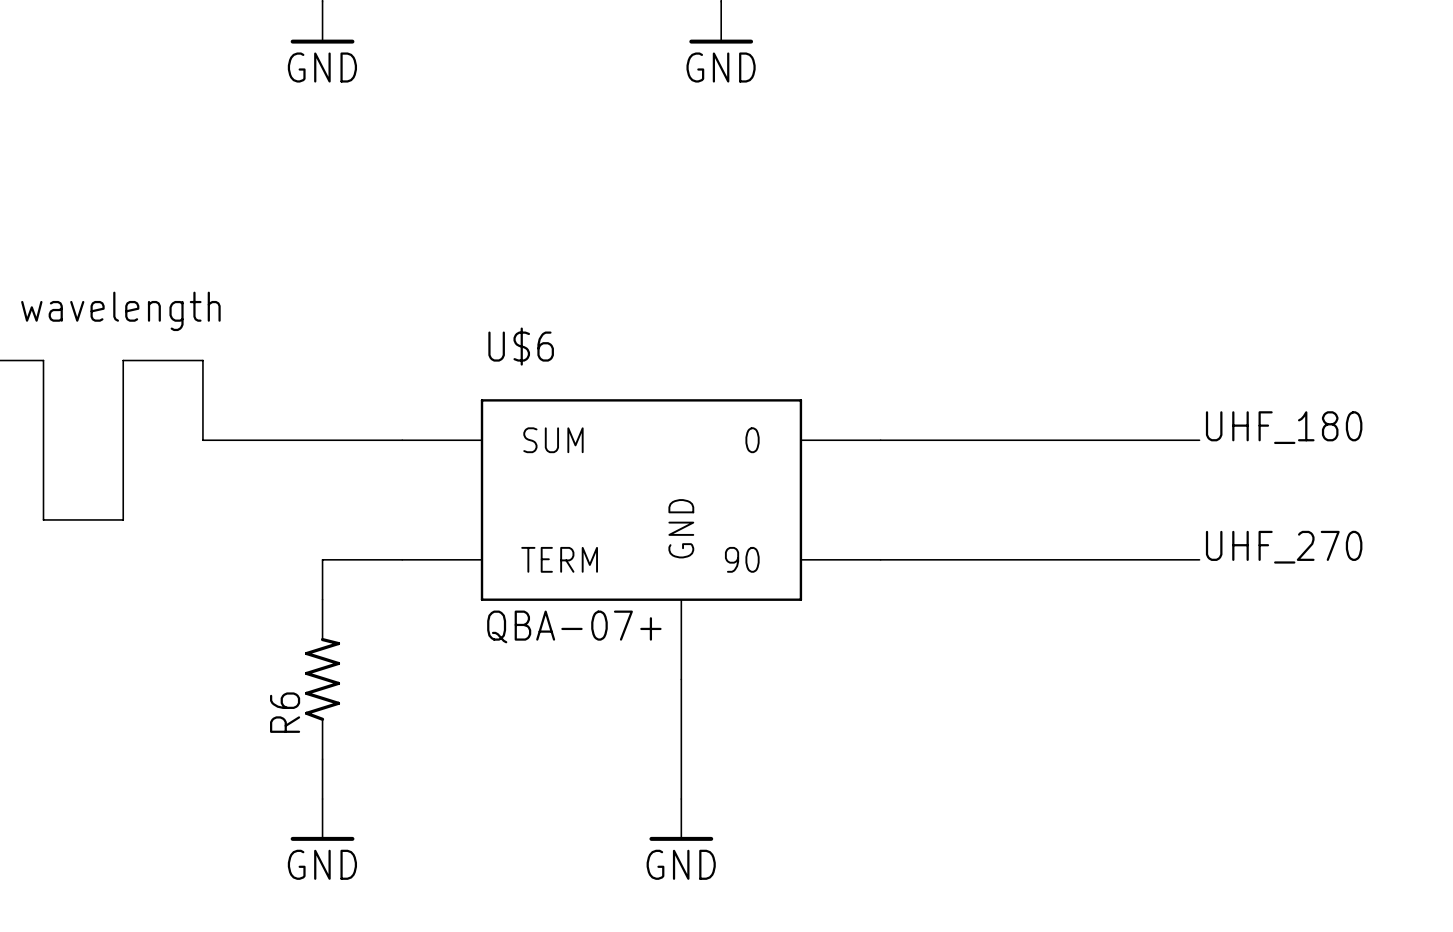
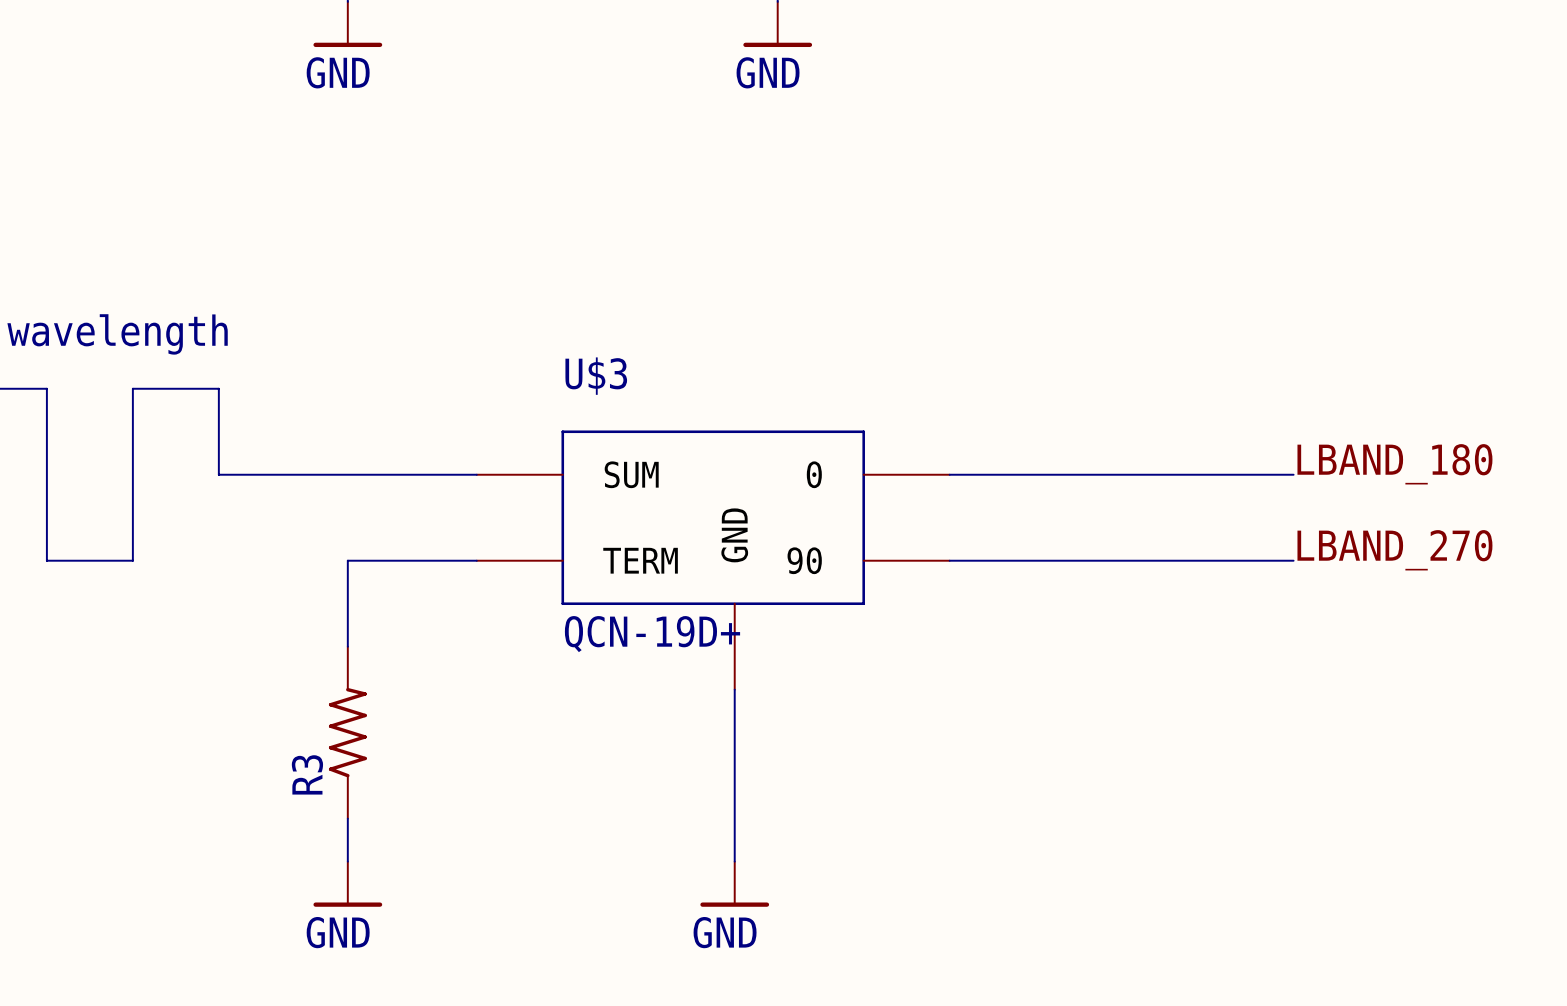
label: UHF_180 (1284, 427) -> LBAND_180 (1394, 464)
label: none -> LBAND_270 (1394, 550)
U$3: none -> QCN-19D+ (713, 560)
U$6: QBA-07+ (641, 539) -> none
label: UHF_270 (1284, 547) -> none
wire: (322, 559) (402, 559) -> (347, 603) (347, 560) (476, 560)
wire: (880, 559) (1199, 559) -> (949, 560) (1293, 560)
R6 name: R6 (285, 712) -> R3 (307, 774)

